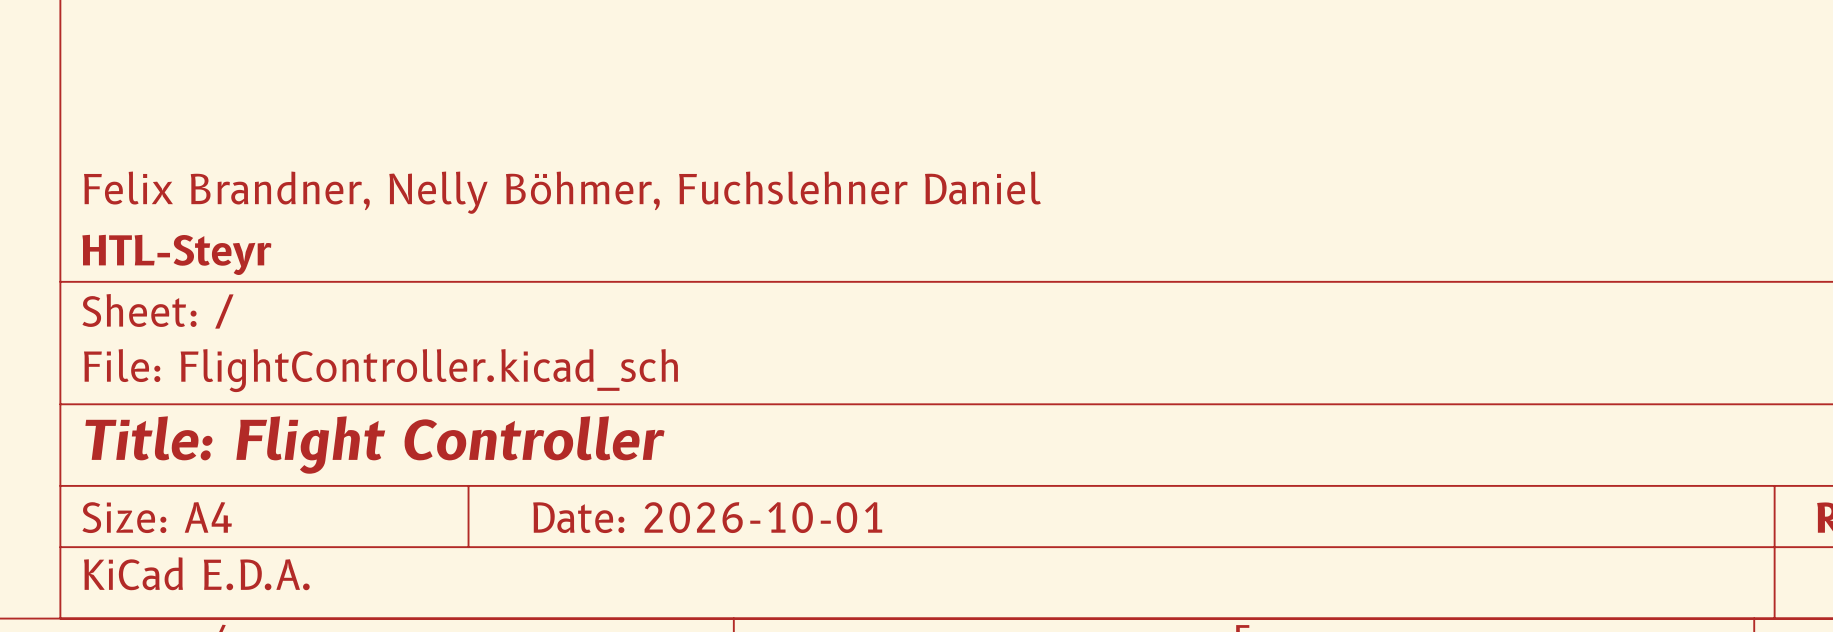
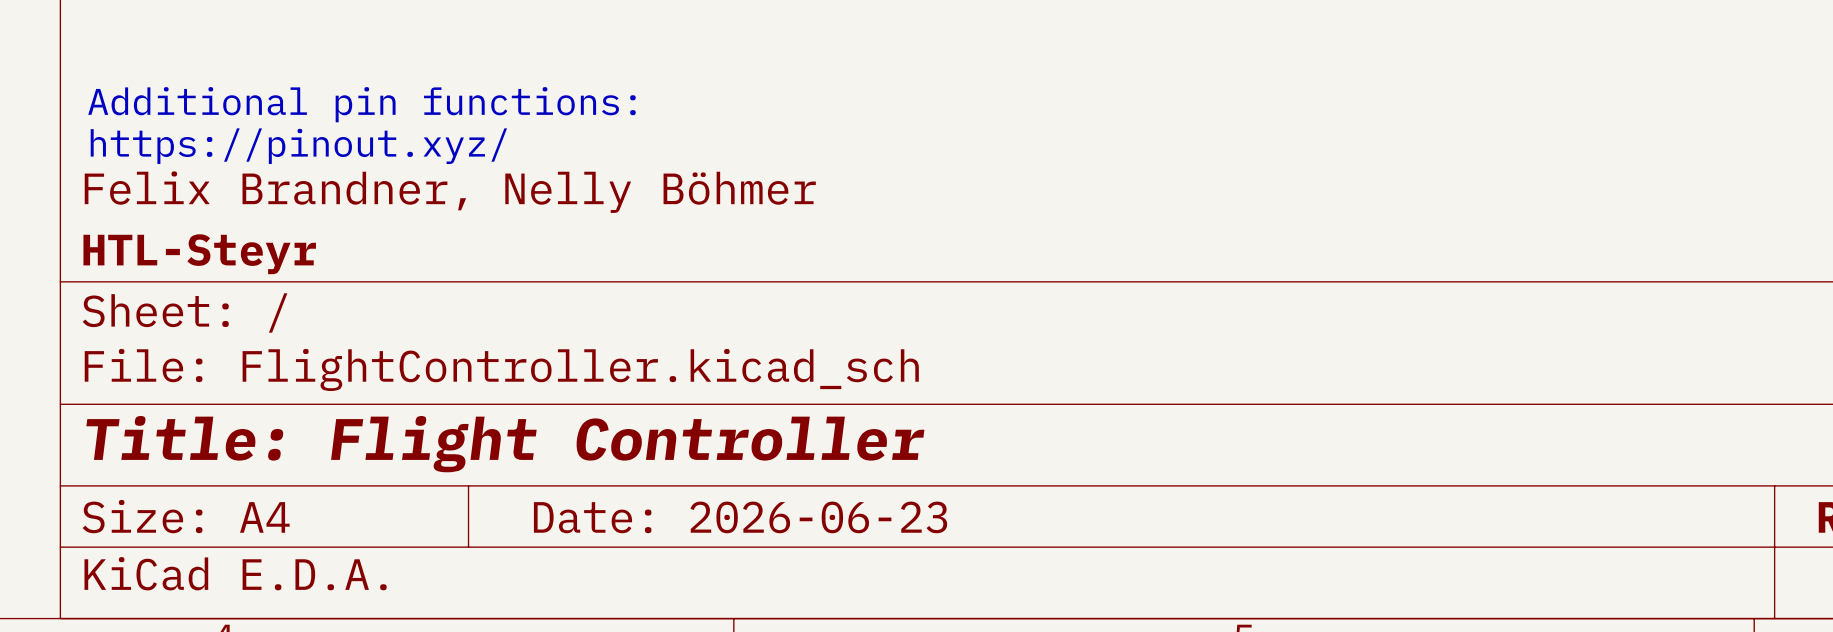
text: none -> Additional pin functions: (361, 104)
text: none -> https://pinout.xyz/ (298, 146)
title block: Felix Brandner, Nelly Böhmer, Fuchslehner Daniel (562, 192) -> Felix Brandner, Nelly Böhmer (450, 192)
title block: Date: 2026-10-01 (707, 517) -> Date: 2026-06-23 (740, 517)

